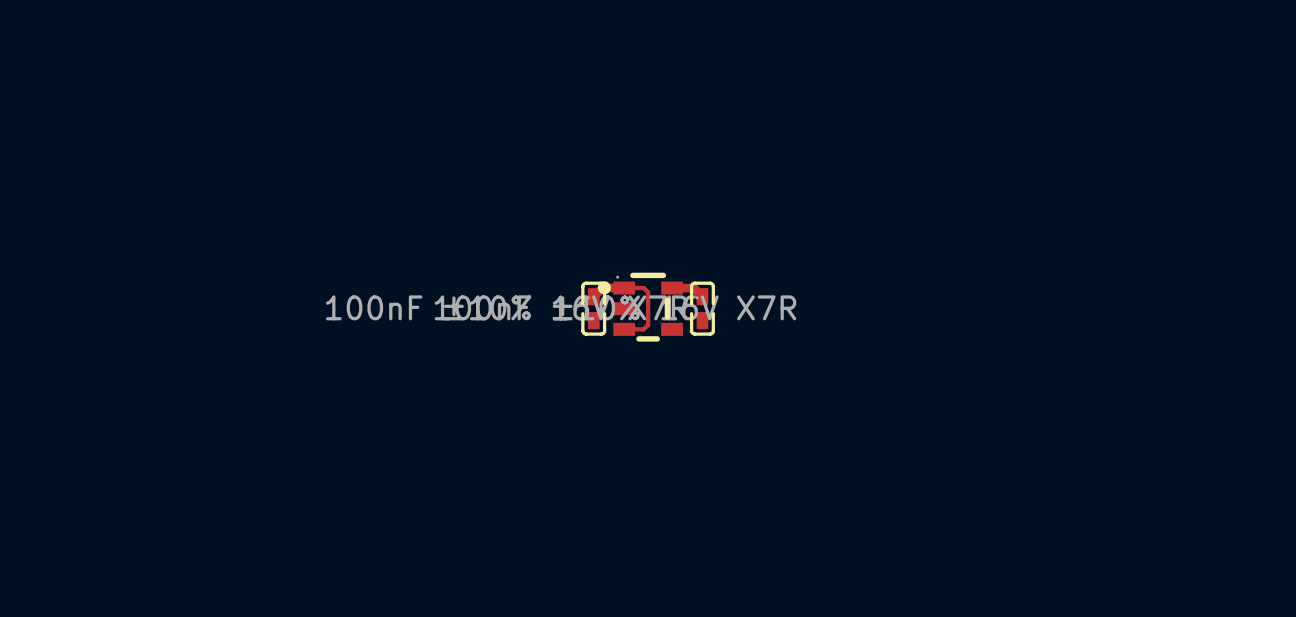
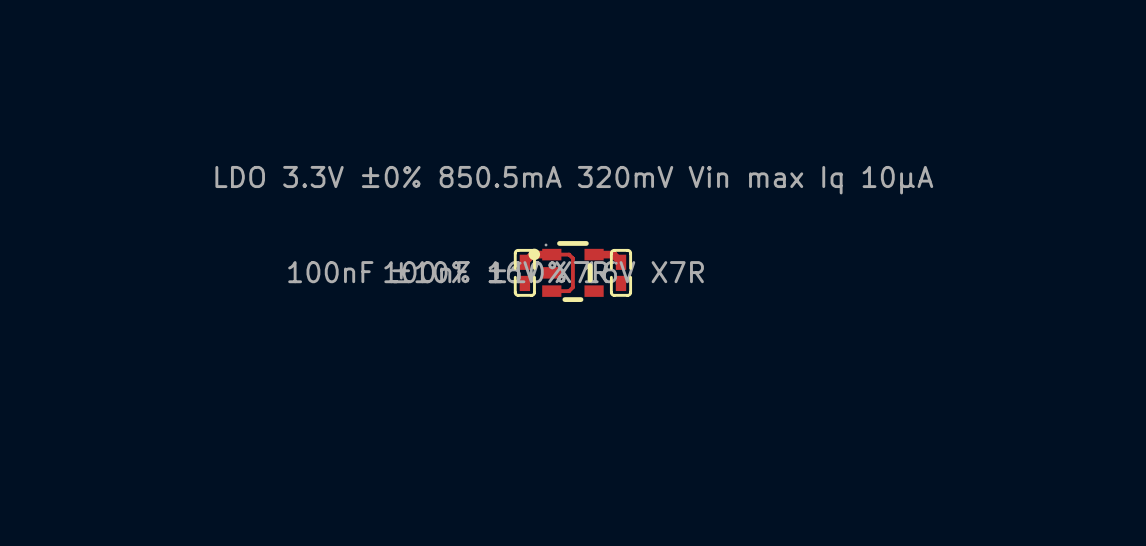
part value: none -> LDO 3.3V ±0% 850.5mA 320mV Vin max Iq 10µA (574, 180)

